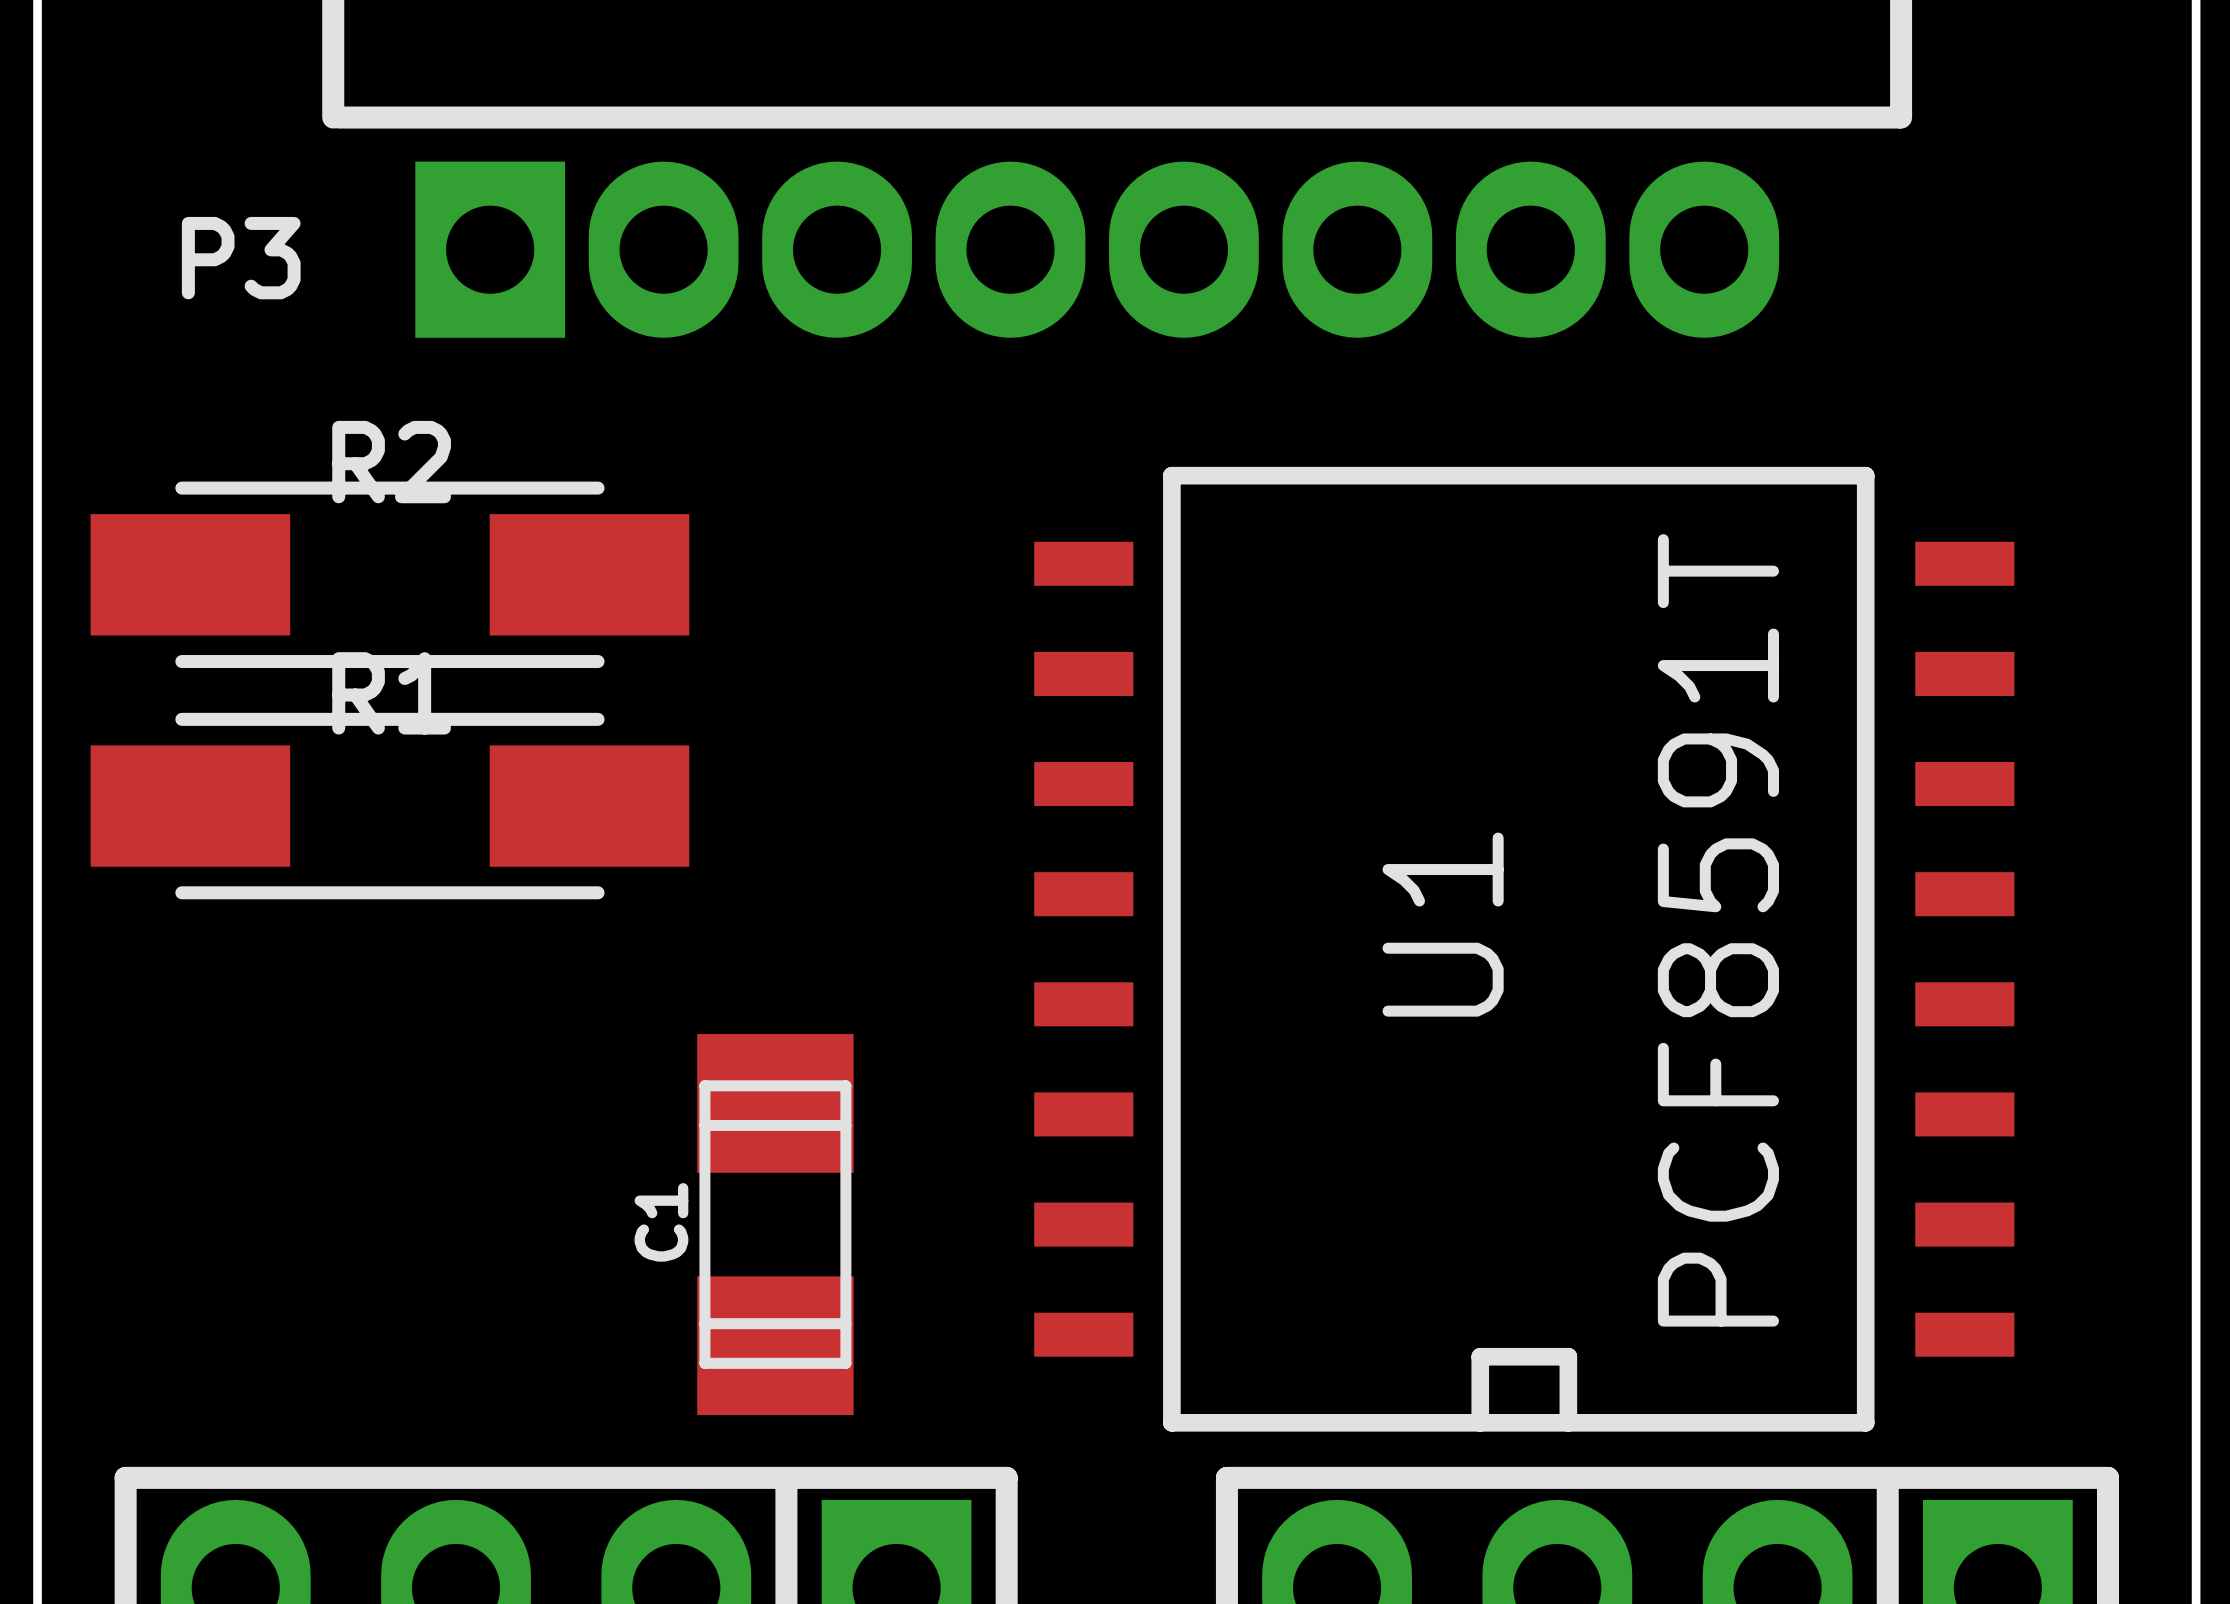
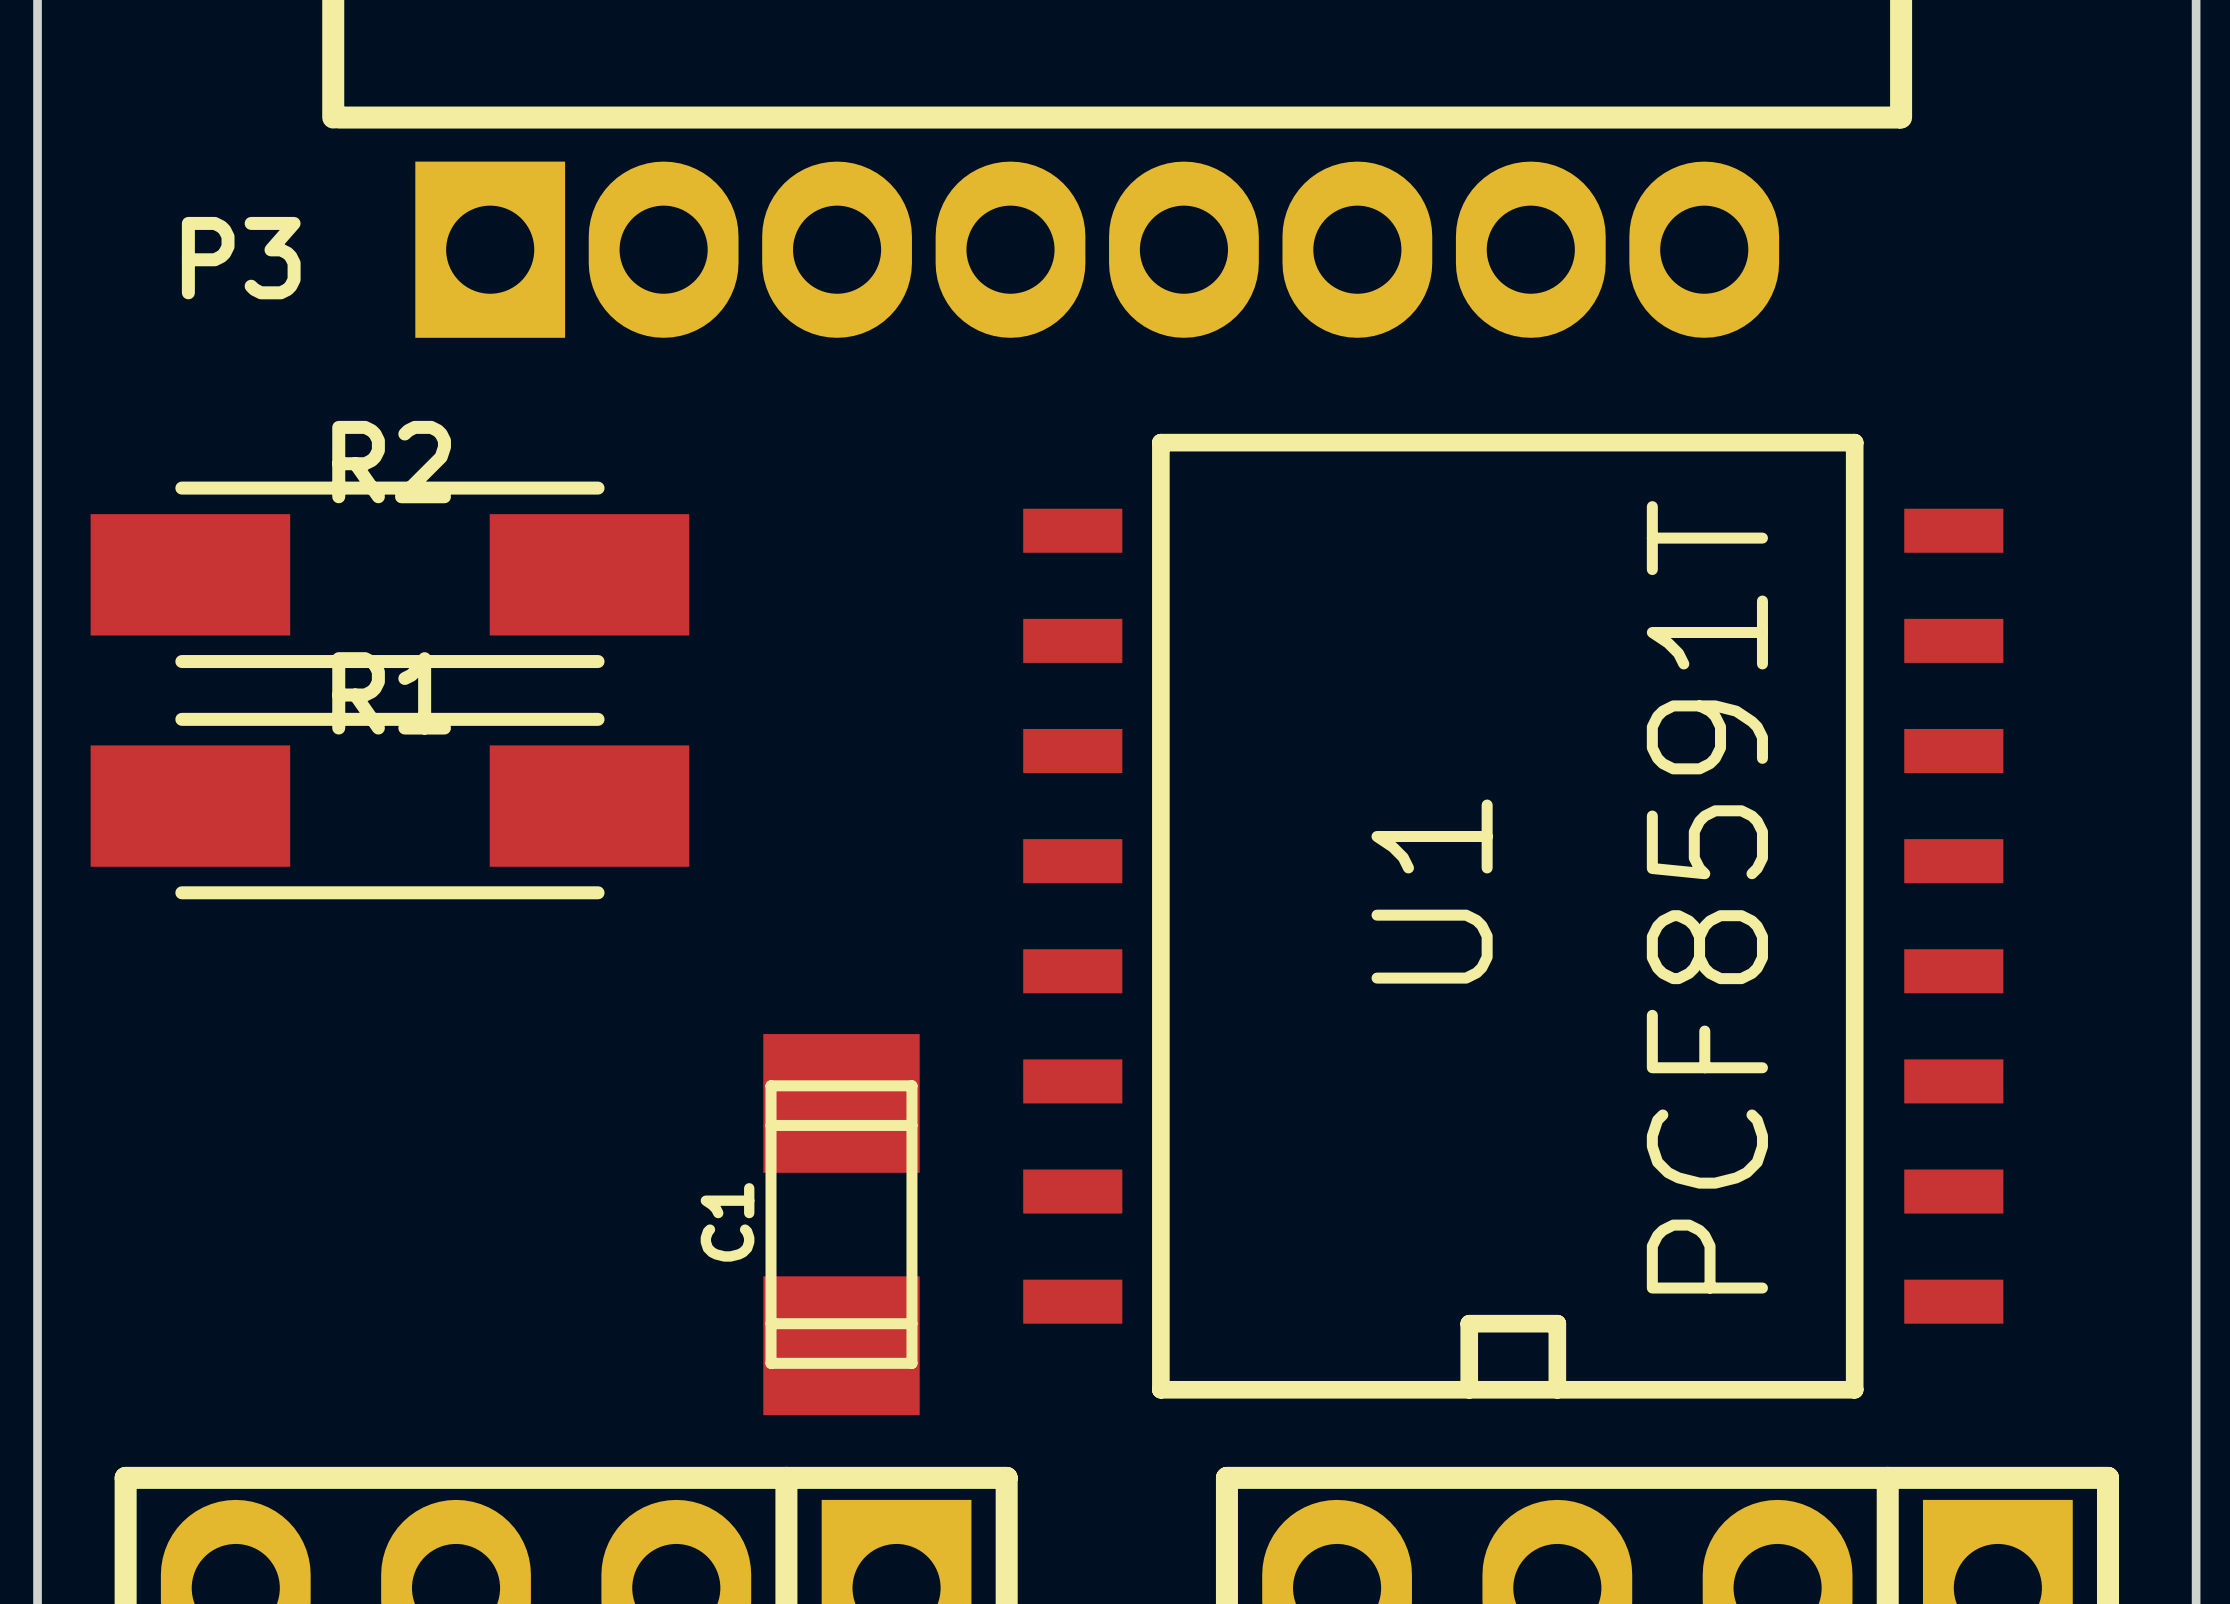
U1 position: (1524, 949) -> (1513, 916)
C1 position: (775, 1224) -> (841, 1224)

